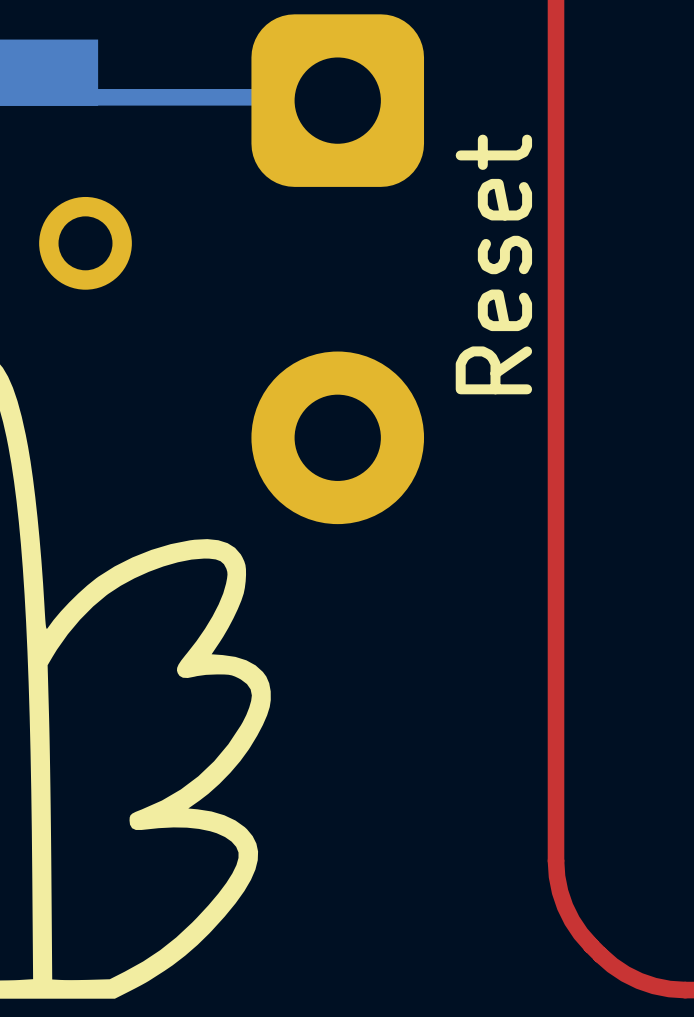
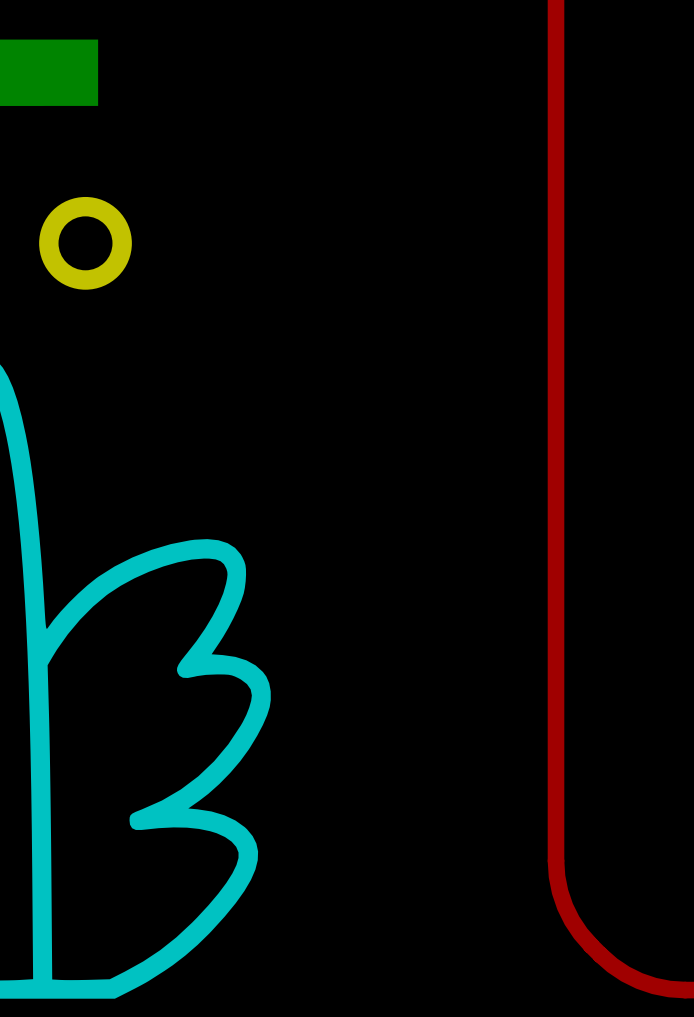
bottom track: (41, 97) (334, 97) (337, 100) -> none
Reset: (337, 269) -> none

